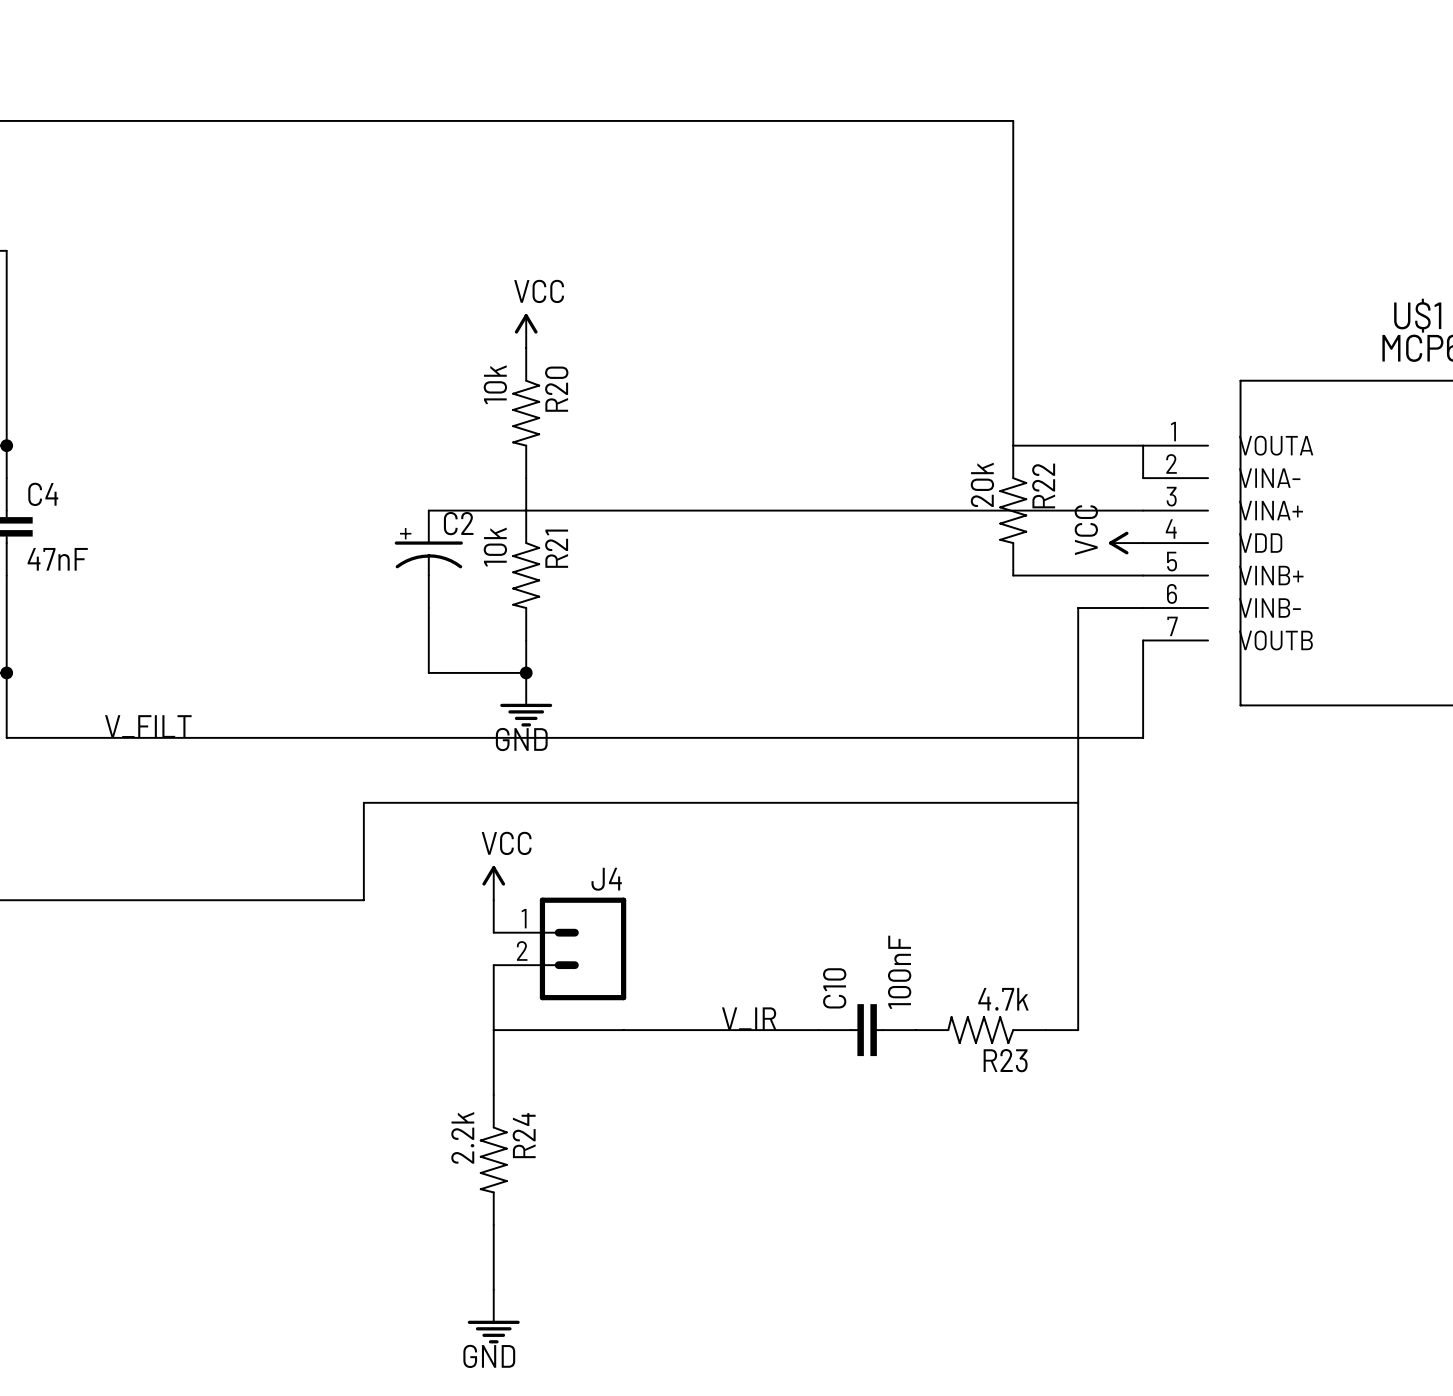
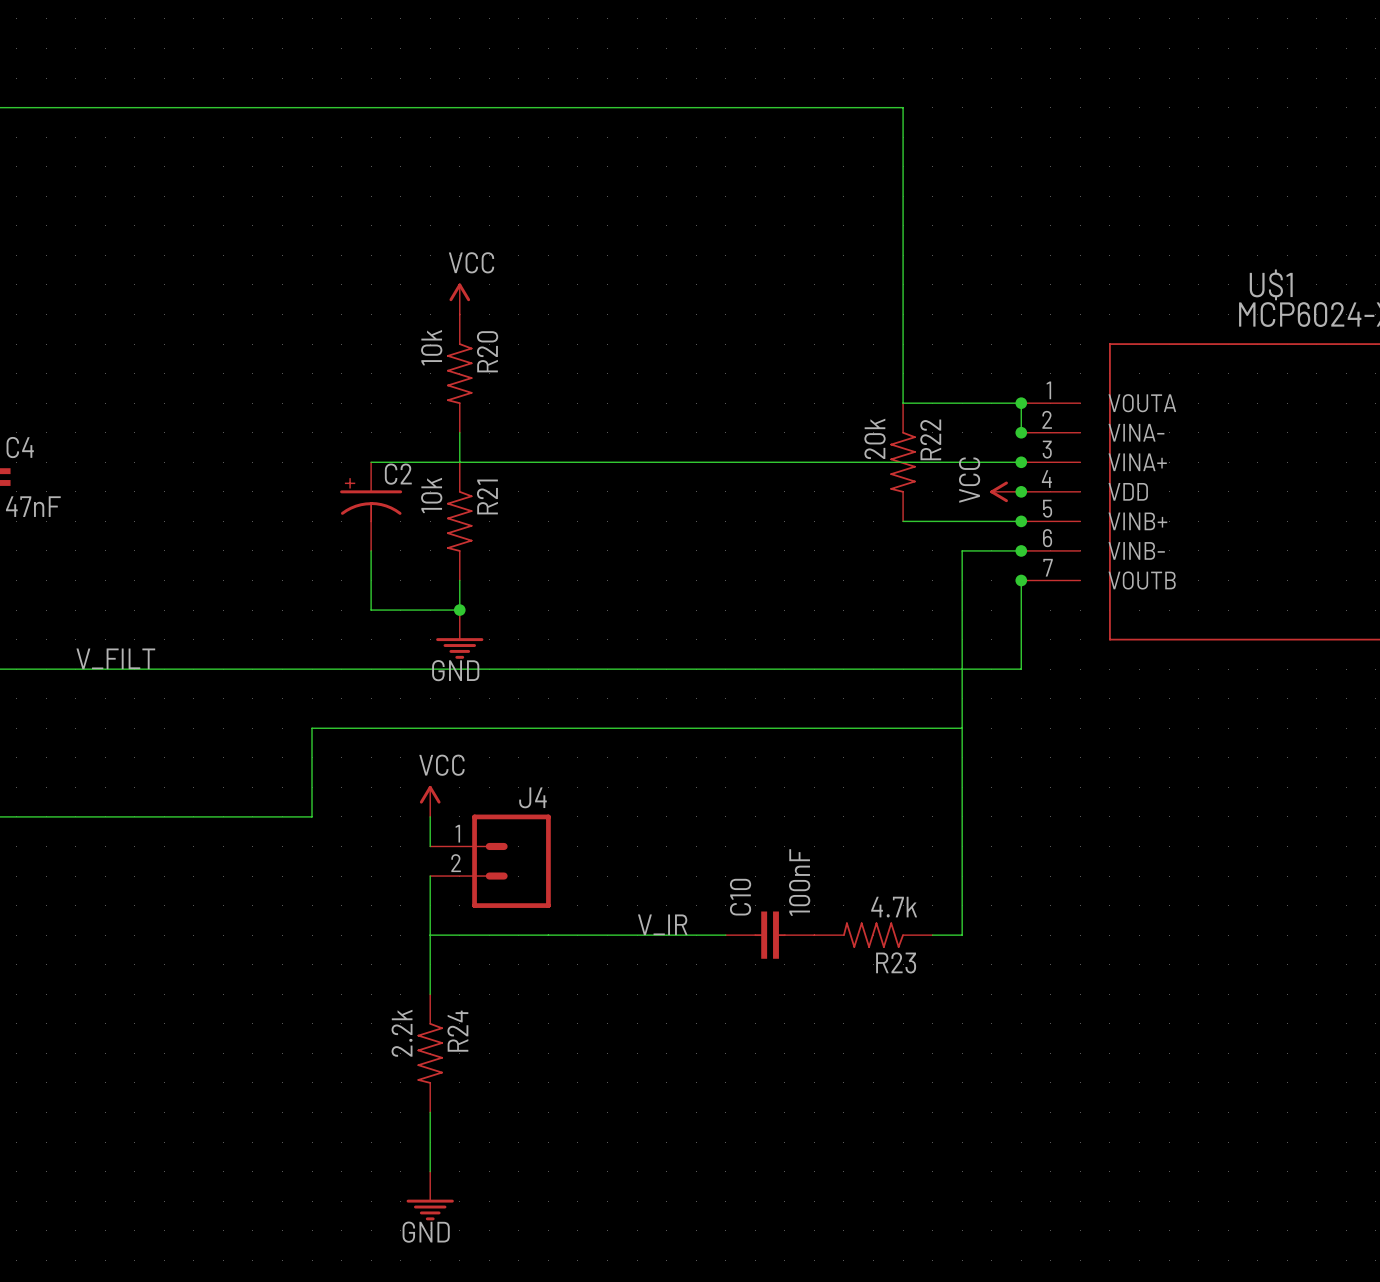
junction: none -> (1021, 403)
junction: none -> (1021, 432)
junction: none -> (1021, 462)
junction: none -> (1021, 491)
junction: none -> (1021, 521)
junction: none -> (1021, 550)
junction: none -> (1021, 580)

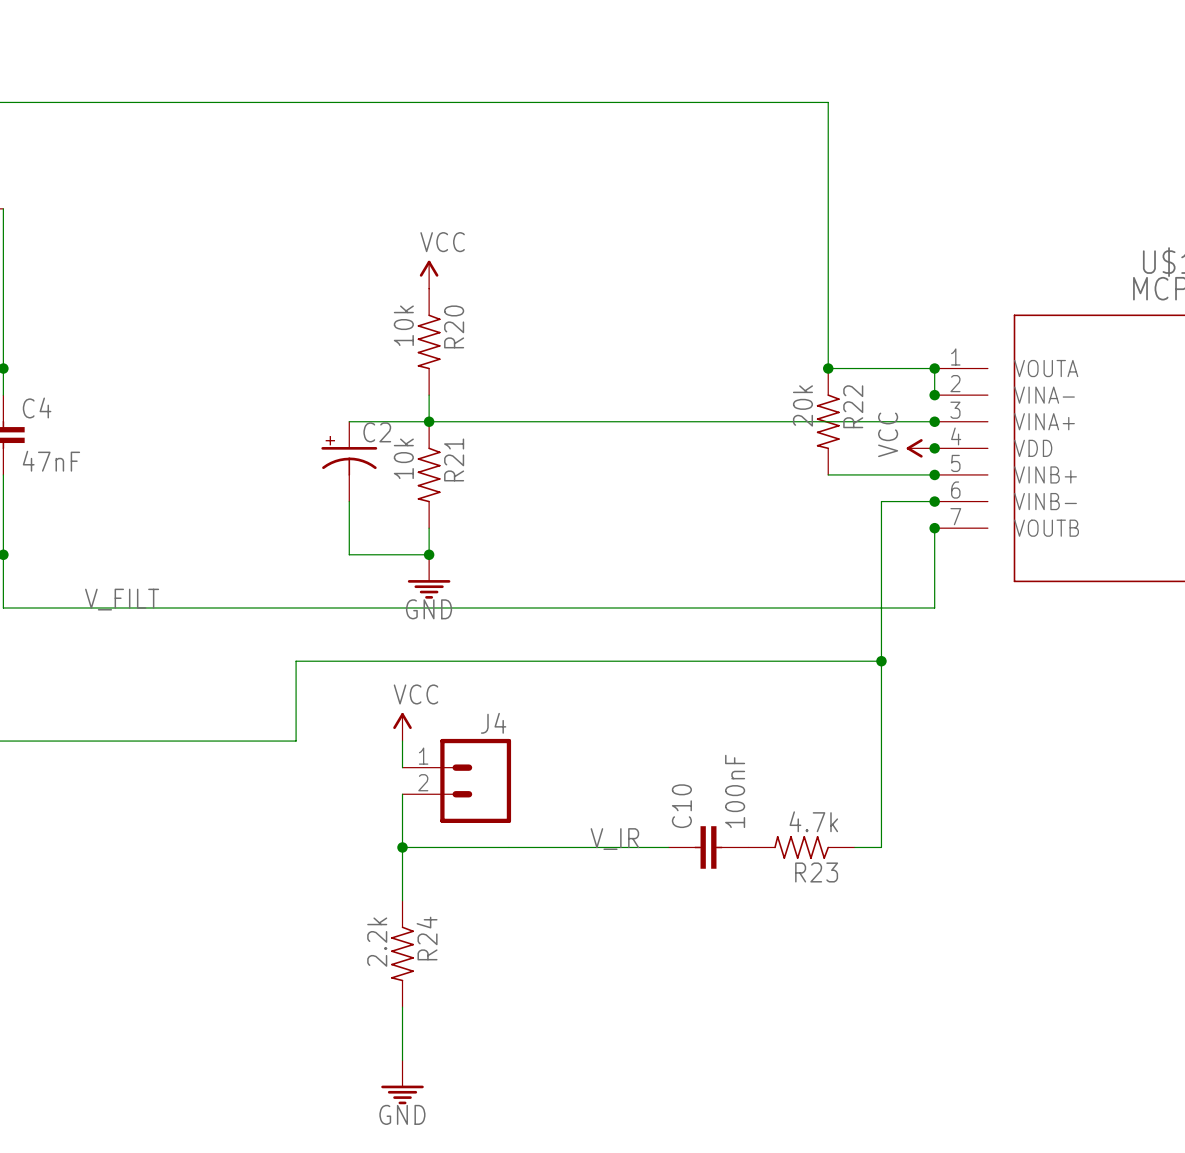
junction: none -> (828, 368)
junction: none -> (429, 421)
junction: none -> (881, 661)
junction: none -> (402, 847)

